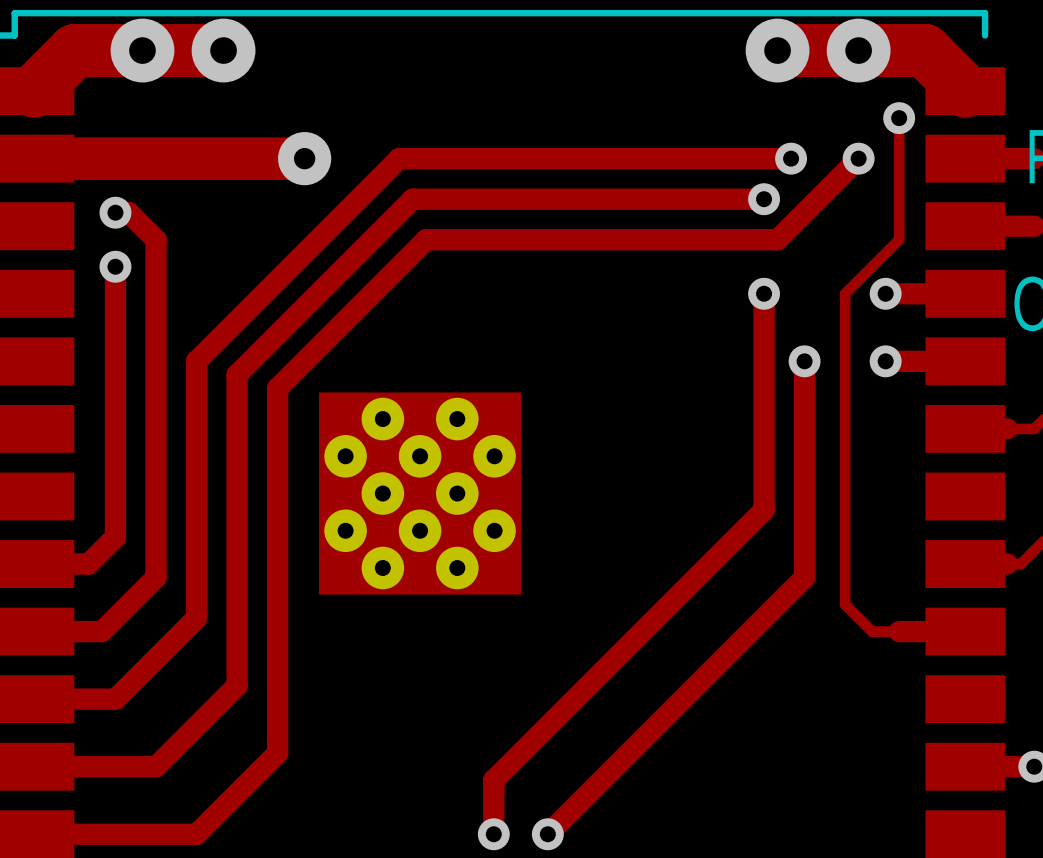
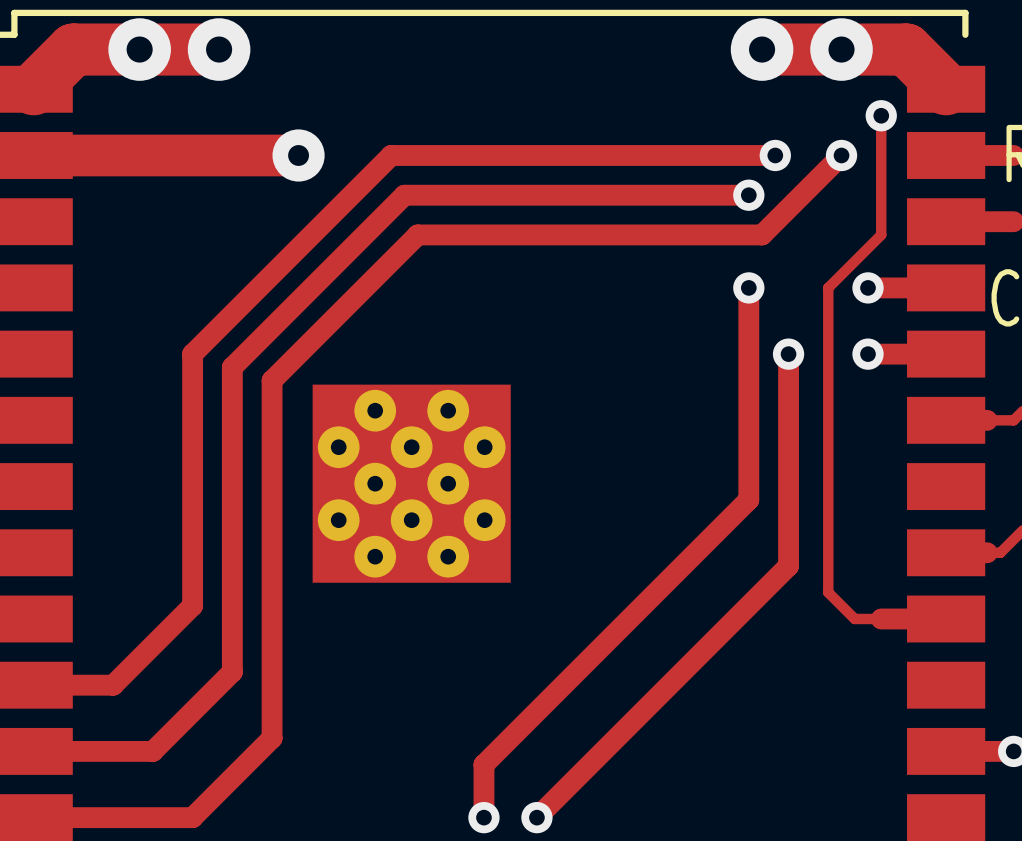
track: (115, 212) (128, 212) (156, 239) (156, 577) (101, 631) (34, 631) -> none
via: (115, 212) -> none
track: (115, 266) (115, 536) (88, 564) (34, 564) -> none
via: (115, 266) -> none

